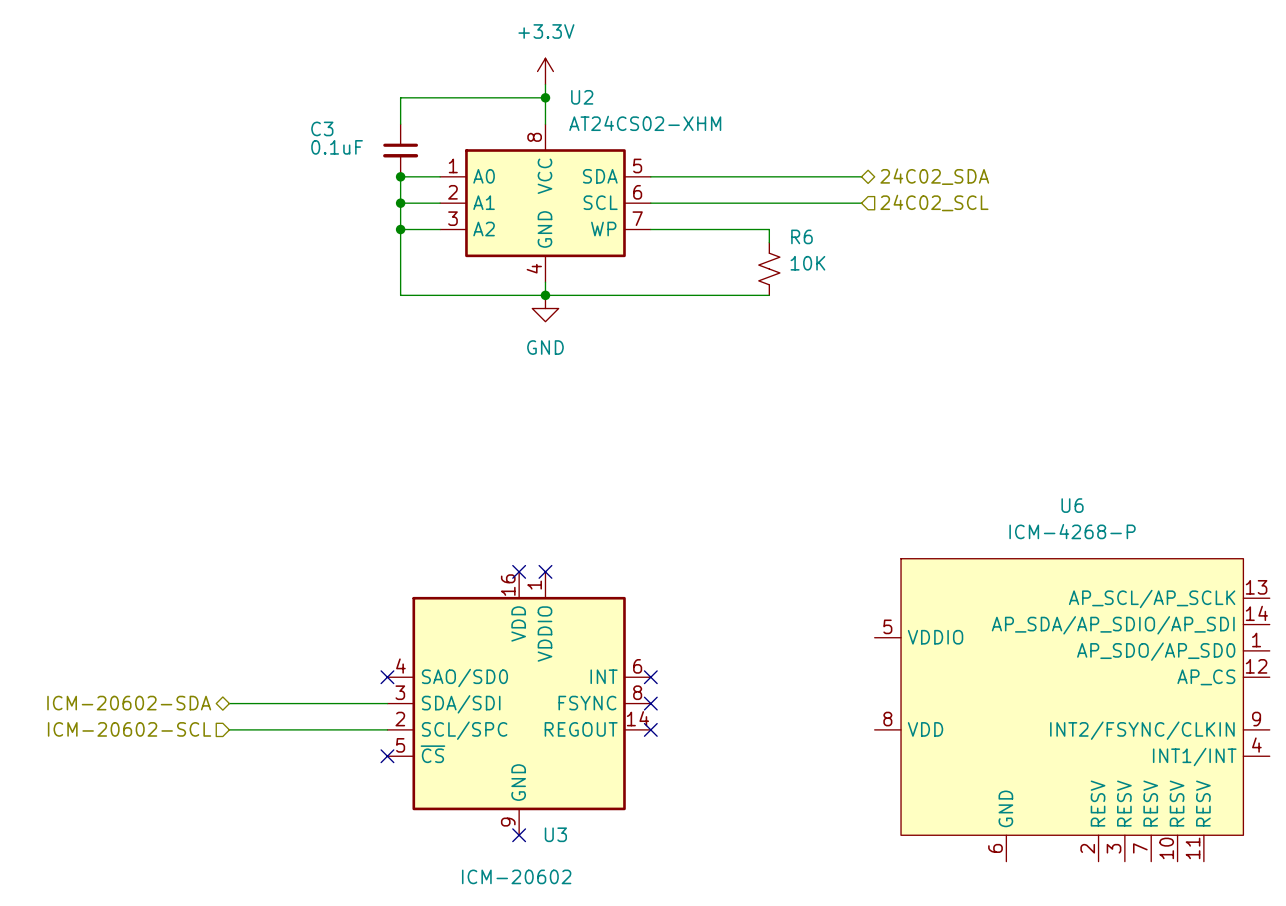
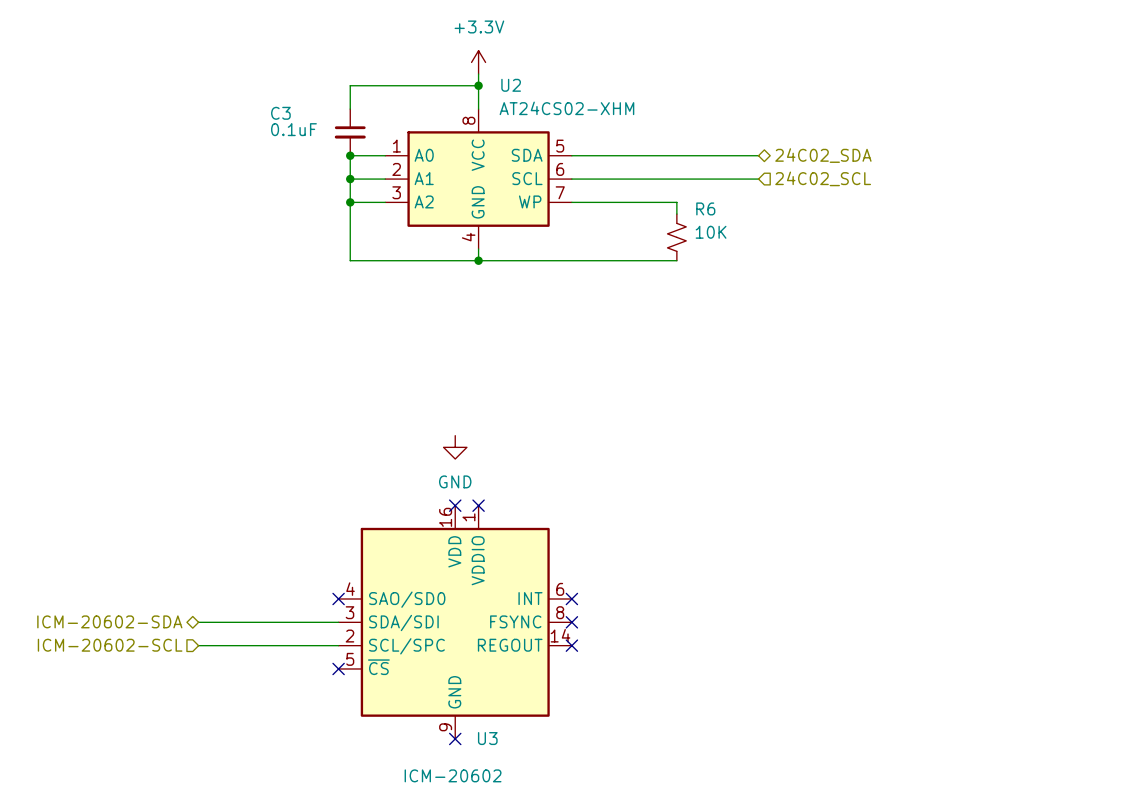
power symbol position: GND (545, 308) -> GND (455, 447)
U6: ICM-4268-P (1072, 710) -> none

